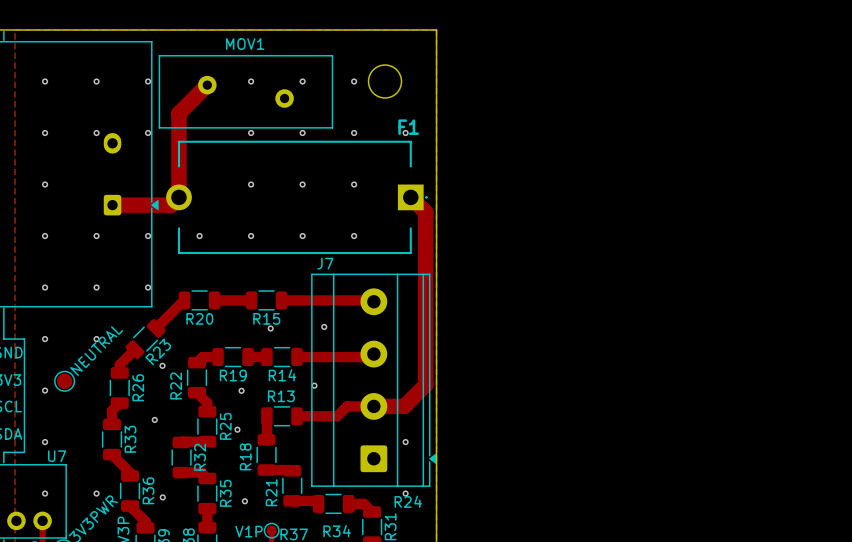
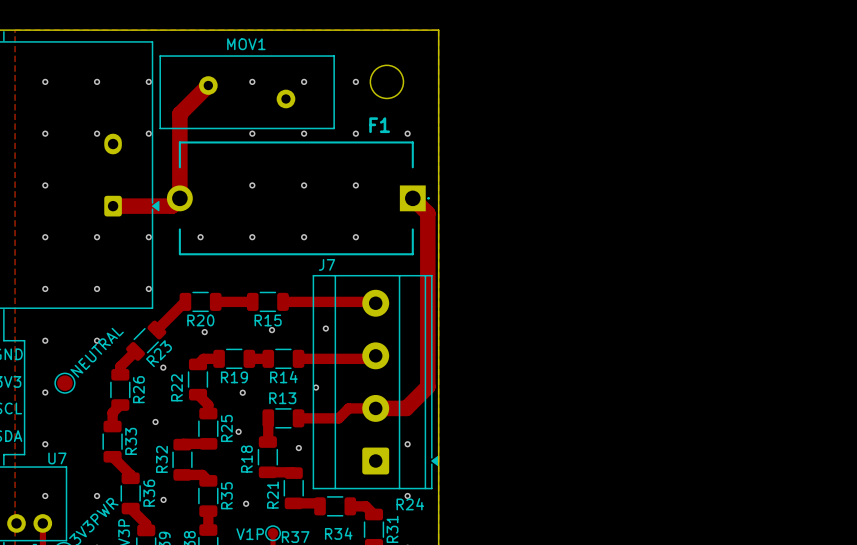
F1 name position: F1 (408, 127) -> F1 (379, 125)
via: none -> (204, 332)
via: none -> (298, 448)
R32 name position: R32 (200, 457) -> R32 (161, 459)

